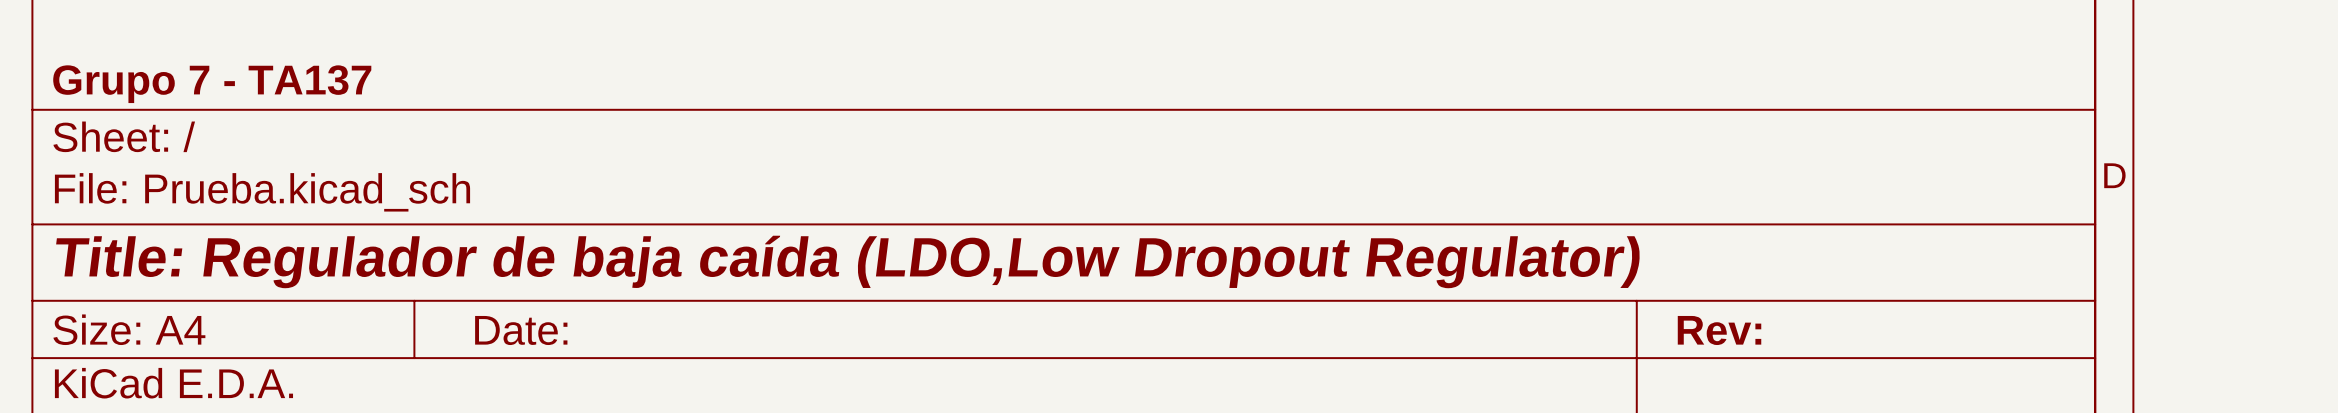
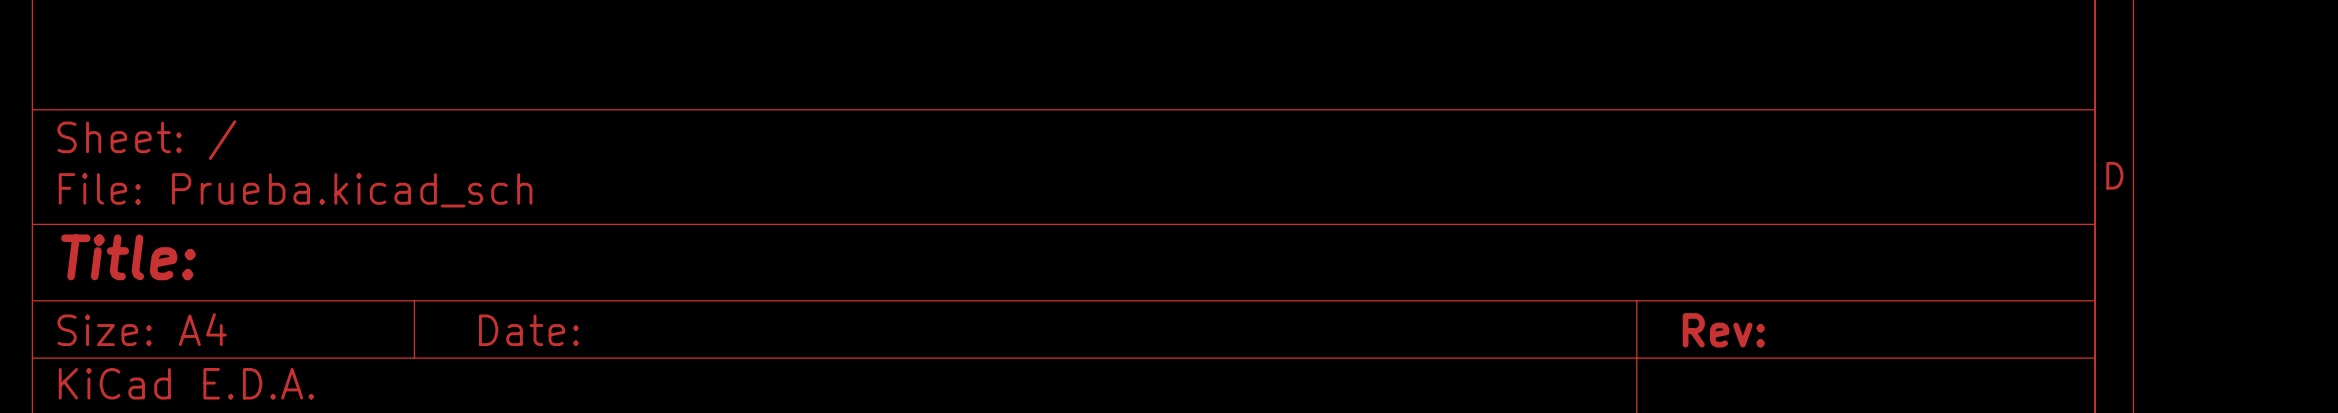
title block: Grupo 7 - TA137 (212, 84) -> none
title block: Title: Regulador de baja caída (LDO,Low Dropout Regulator) (848, 261) -> Title: (128, 257)

